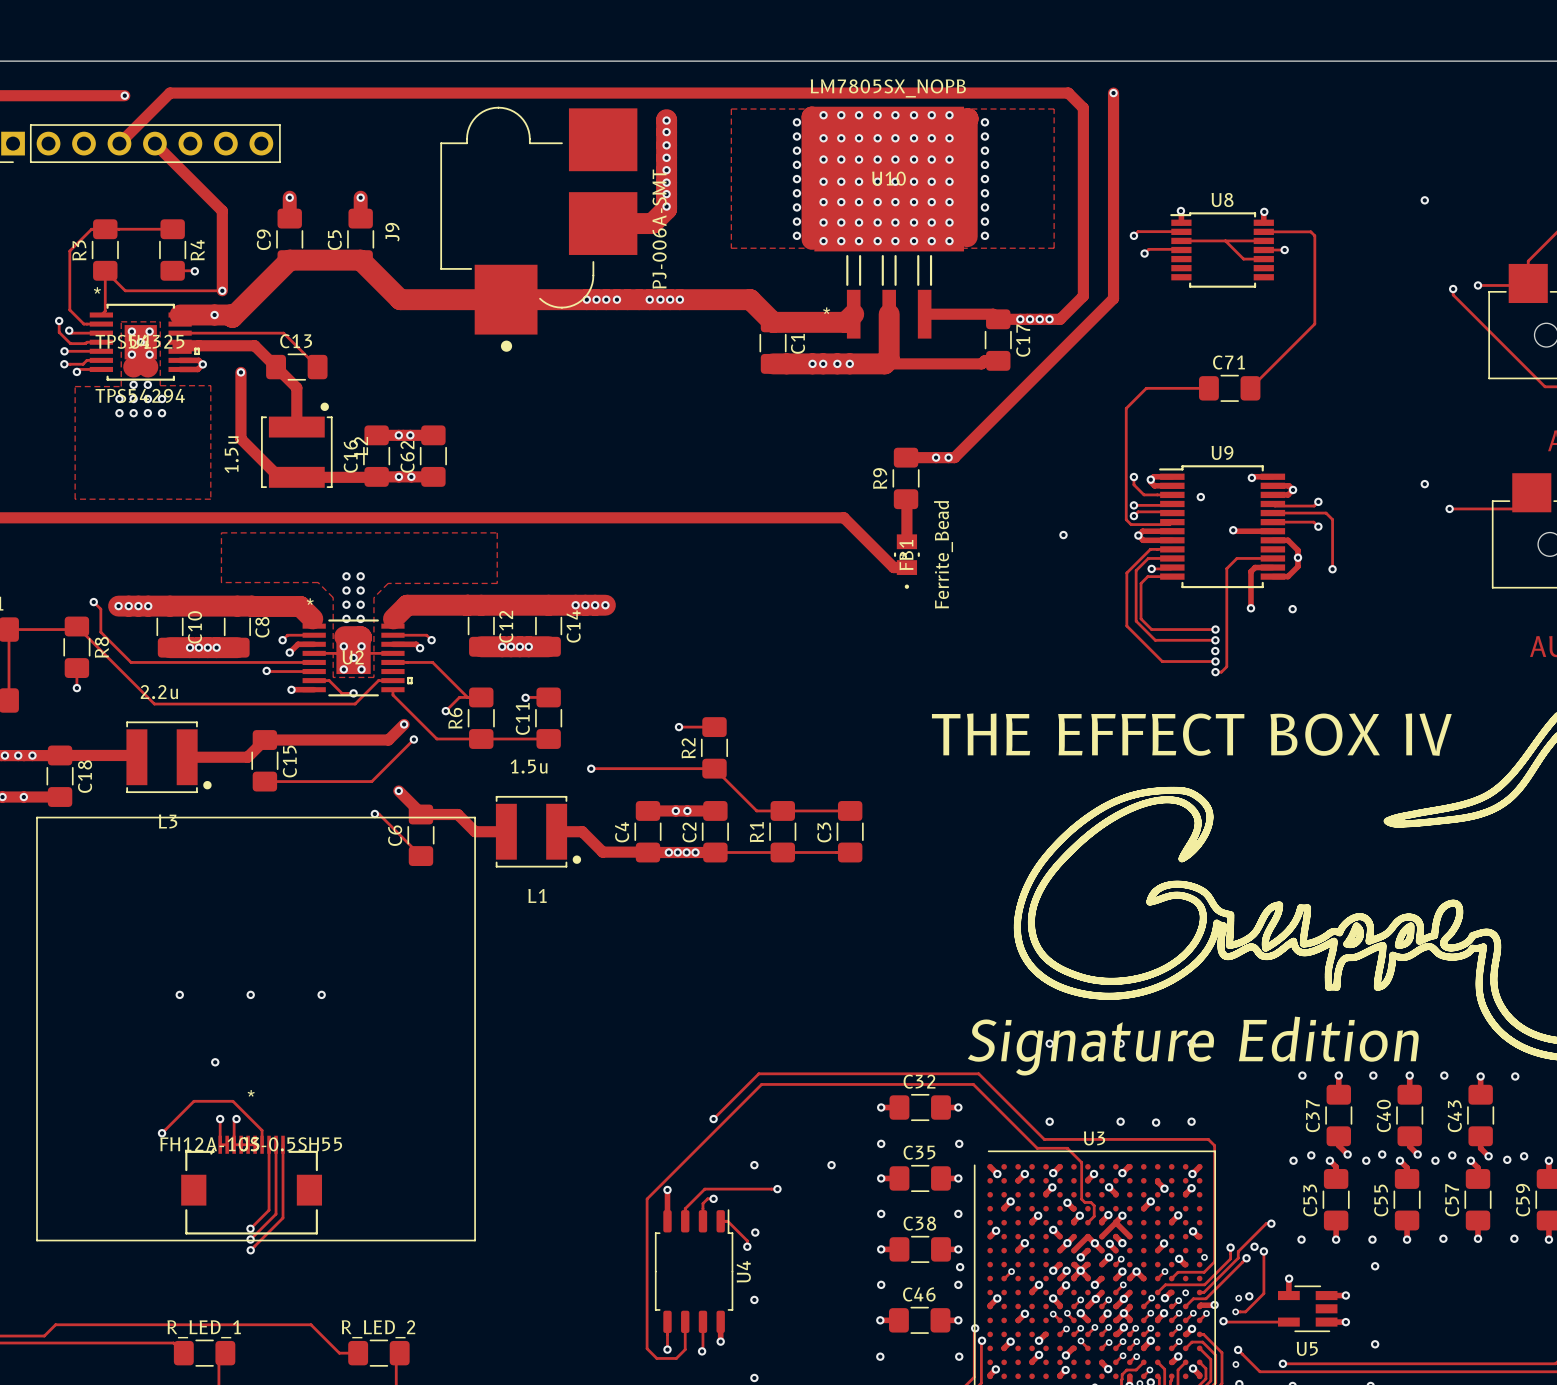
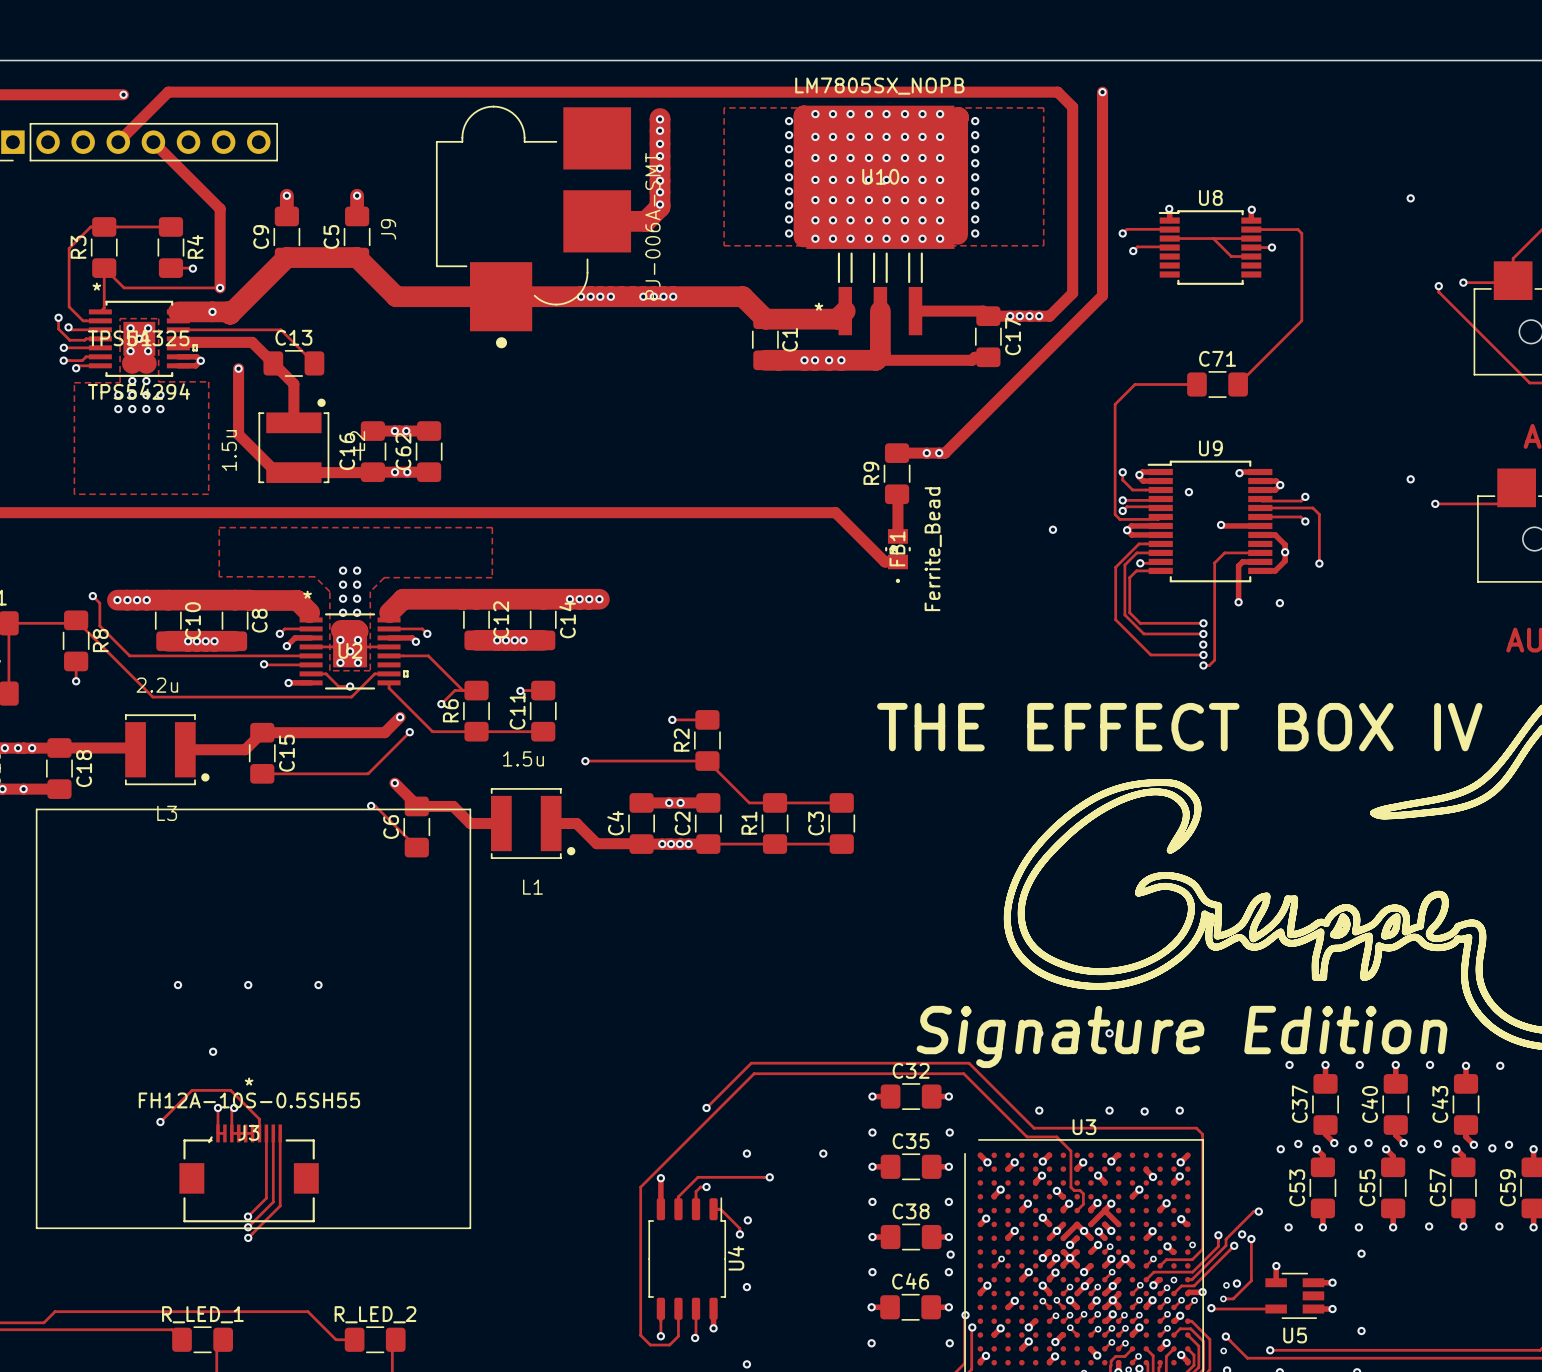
J3 value position: FH12A-10S-0.5SH55 (251, 1144) -> FH12A-10S-0.5SH55 (249, 1100)

